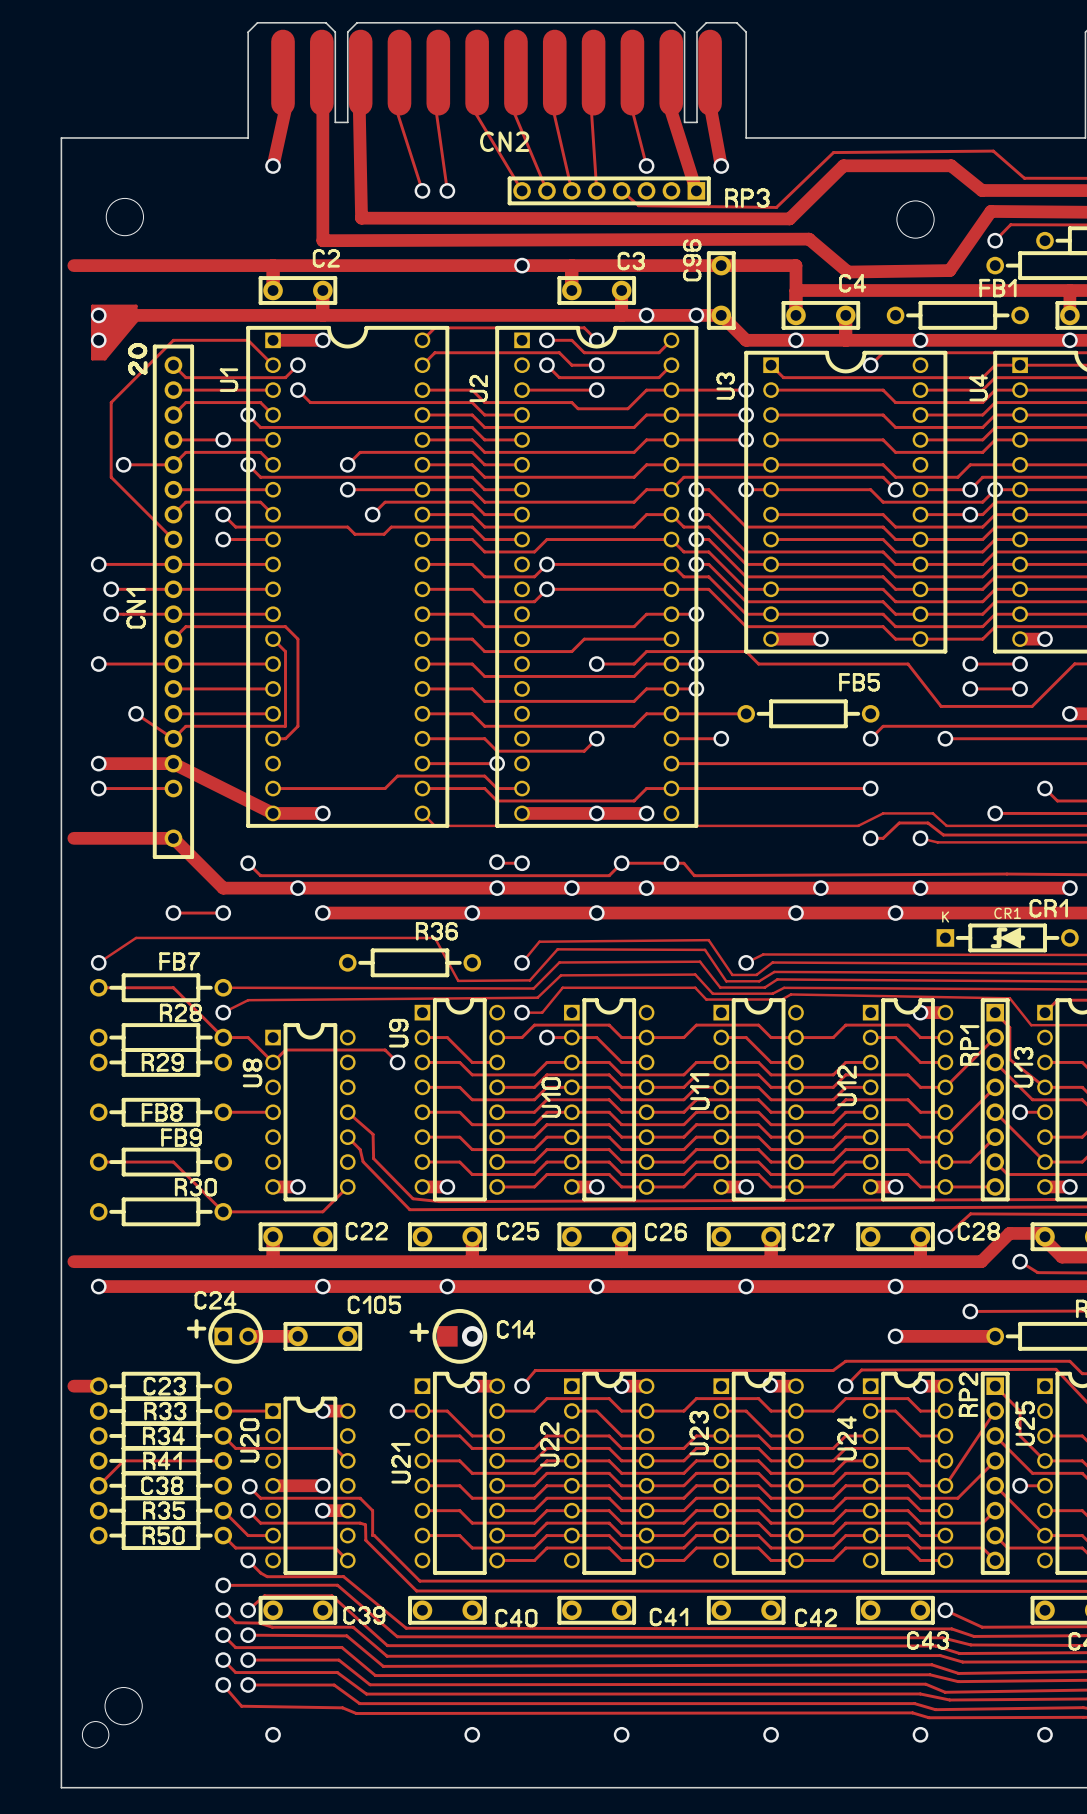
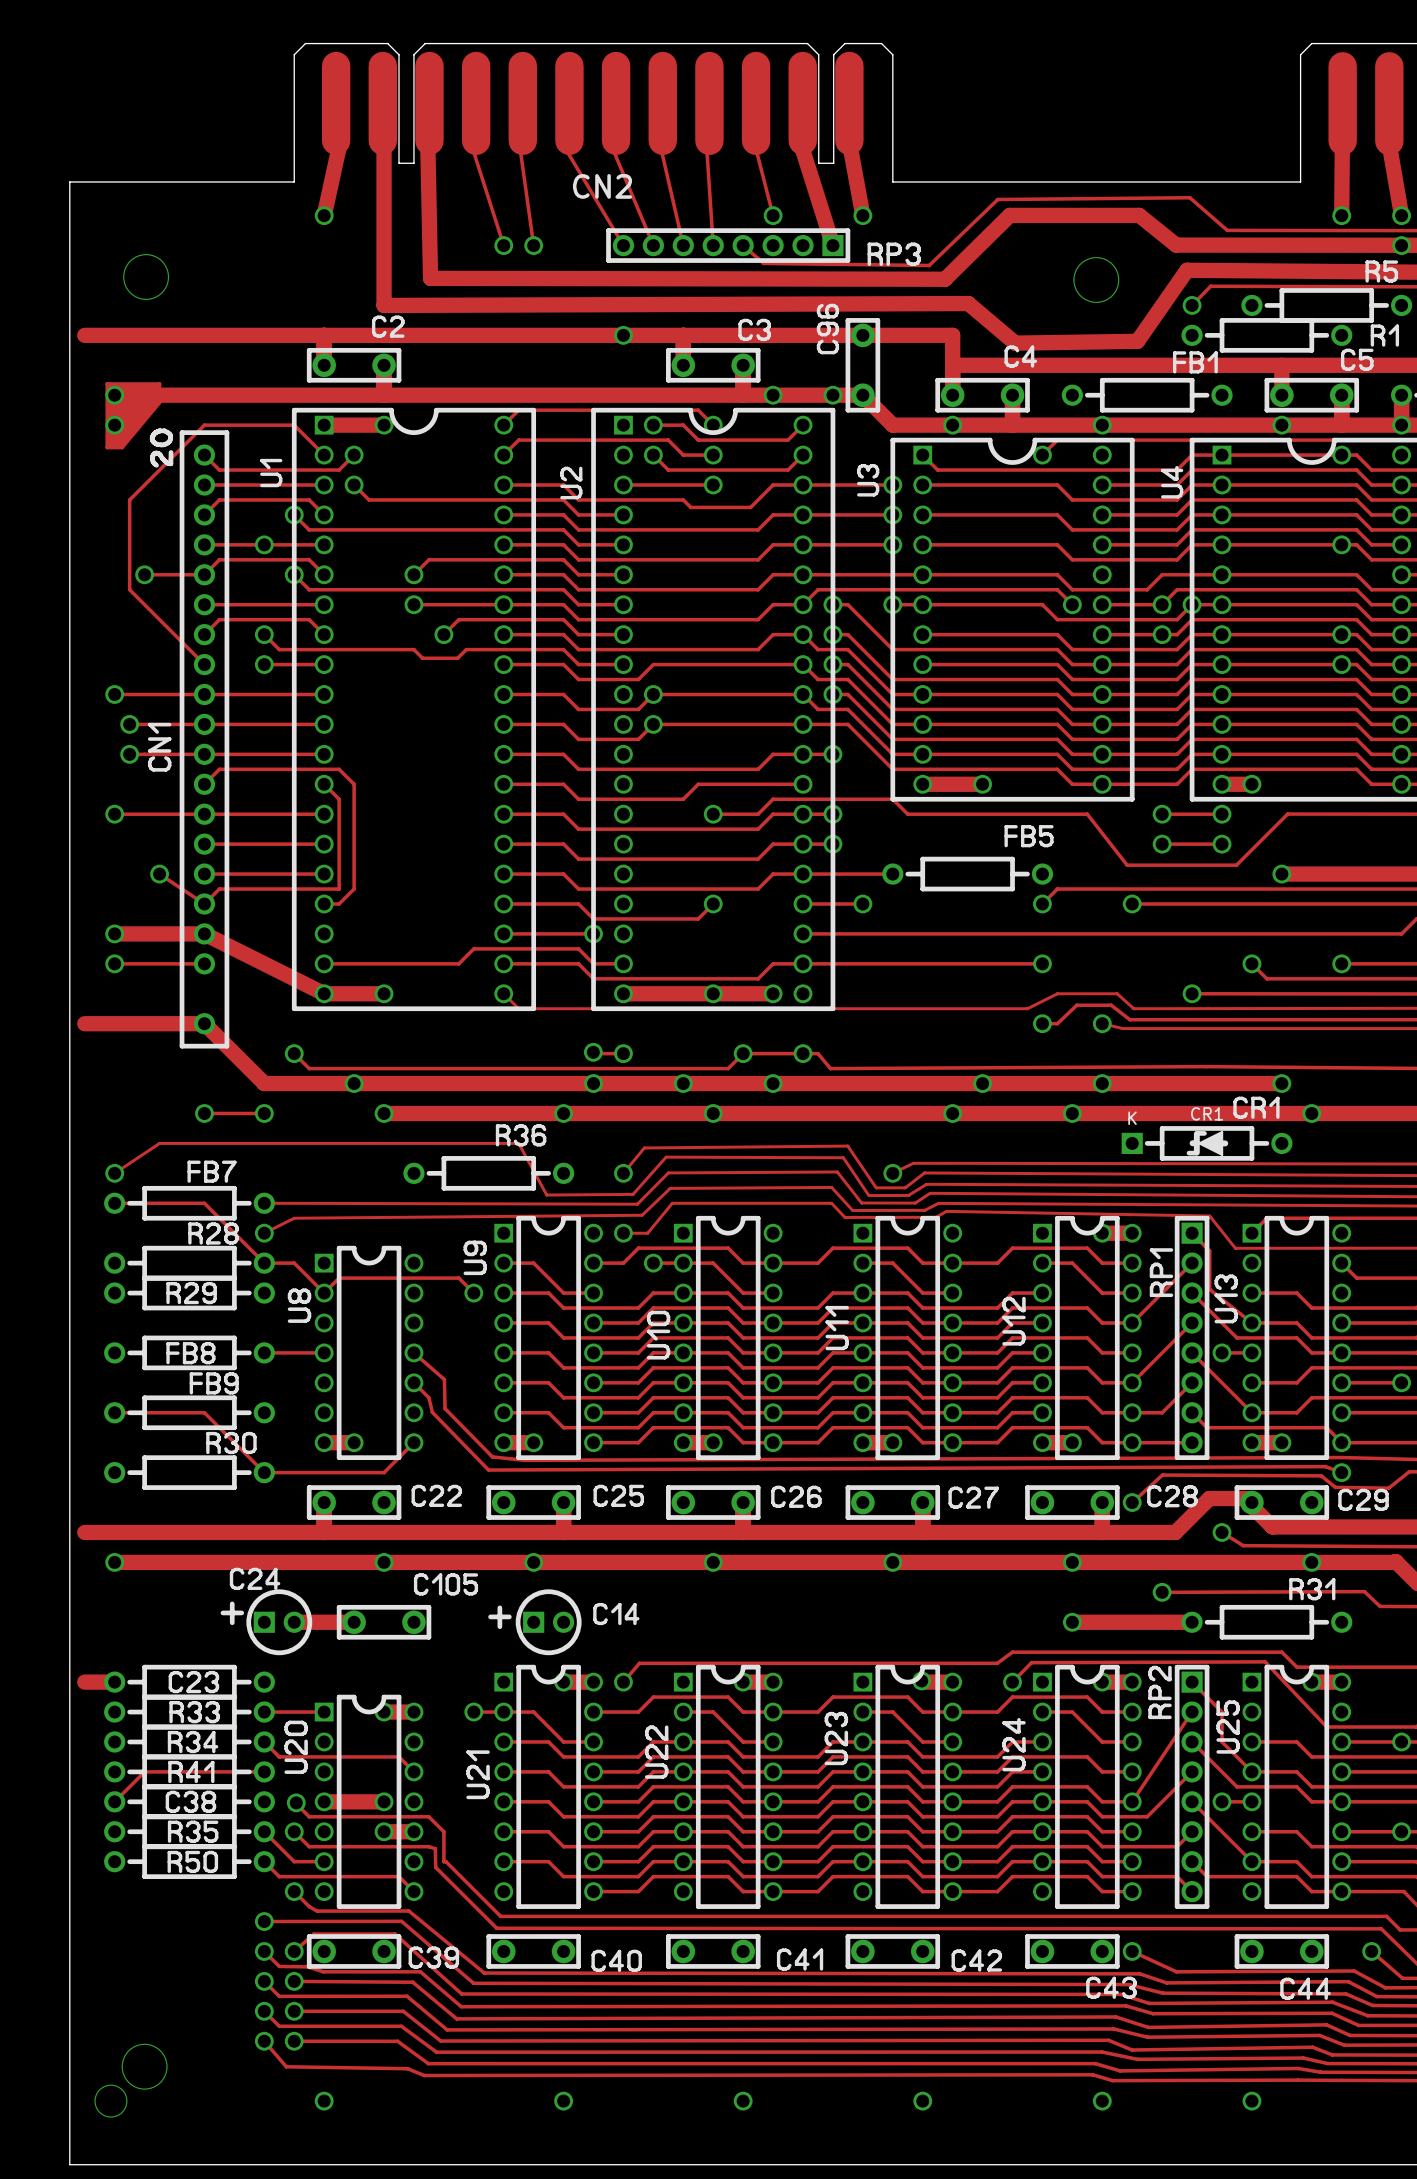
drawing: [437, 1326, 458, 1347] -> none
part: none -> (548, 1622)
via: (472, 1336) -> none

